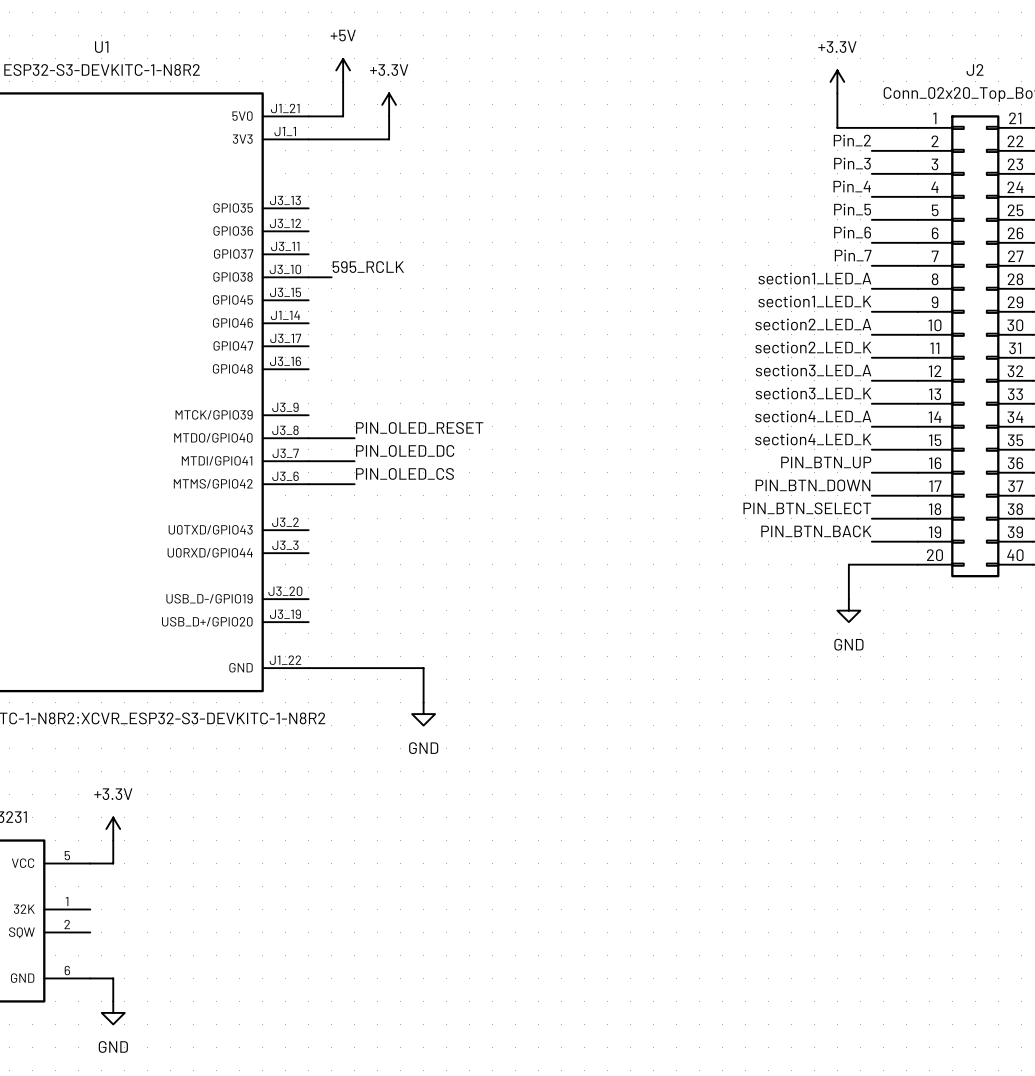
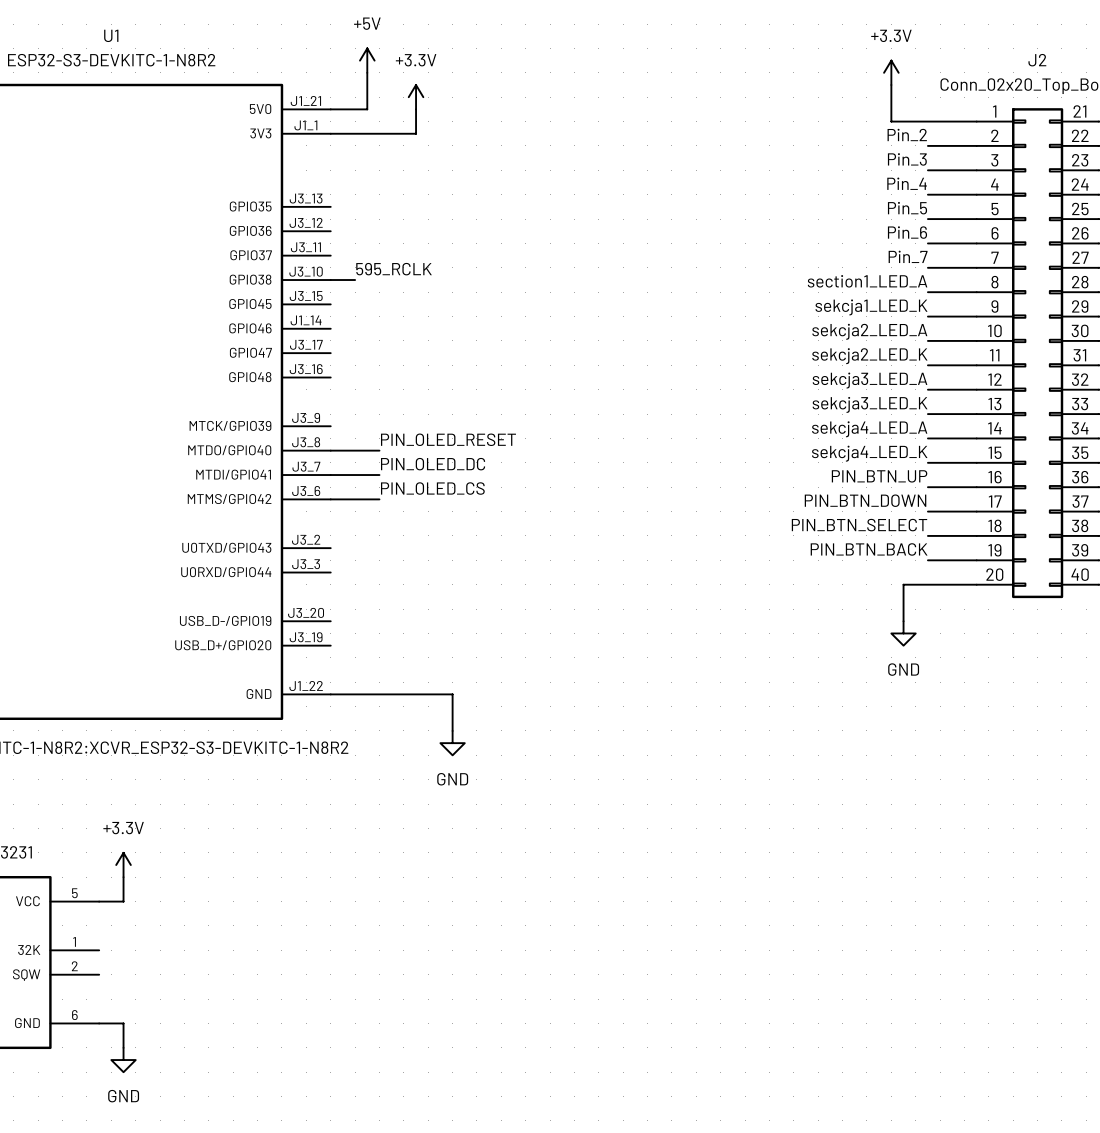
label: section1_LED_K (814, 301) -> sekcja1_LED_K (871, 307)
label: section2_LED_A (813, 324) -> sekcja2_LED_A (869, 331)
label: section2_LED_K (813, 347) -> sekcja2_LED_K (869, 356)
label: section3_LED_A (813, 370) -> sekcja3_LED_A (870, 380)
label: section3_LED_K (813, 393) -> sekcja3_LED_K (870, 404)
label: section4_LED_A (813, 416) -> sekcja4_LED_A (869, 429)
label: section4_LED_K (813, 439) -> sekcja4_LED_K (869, 453)

